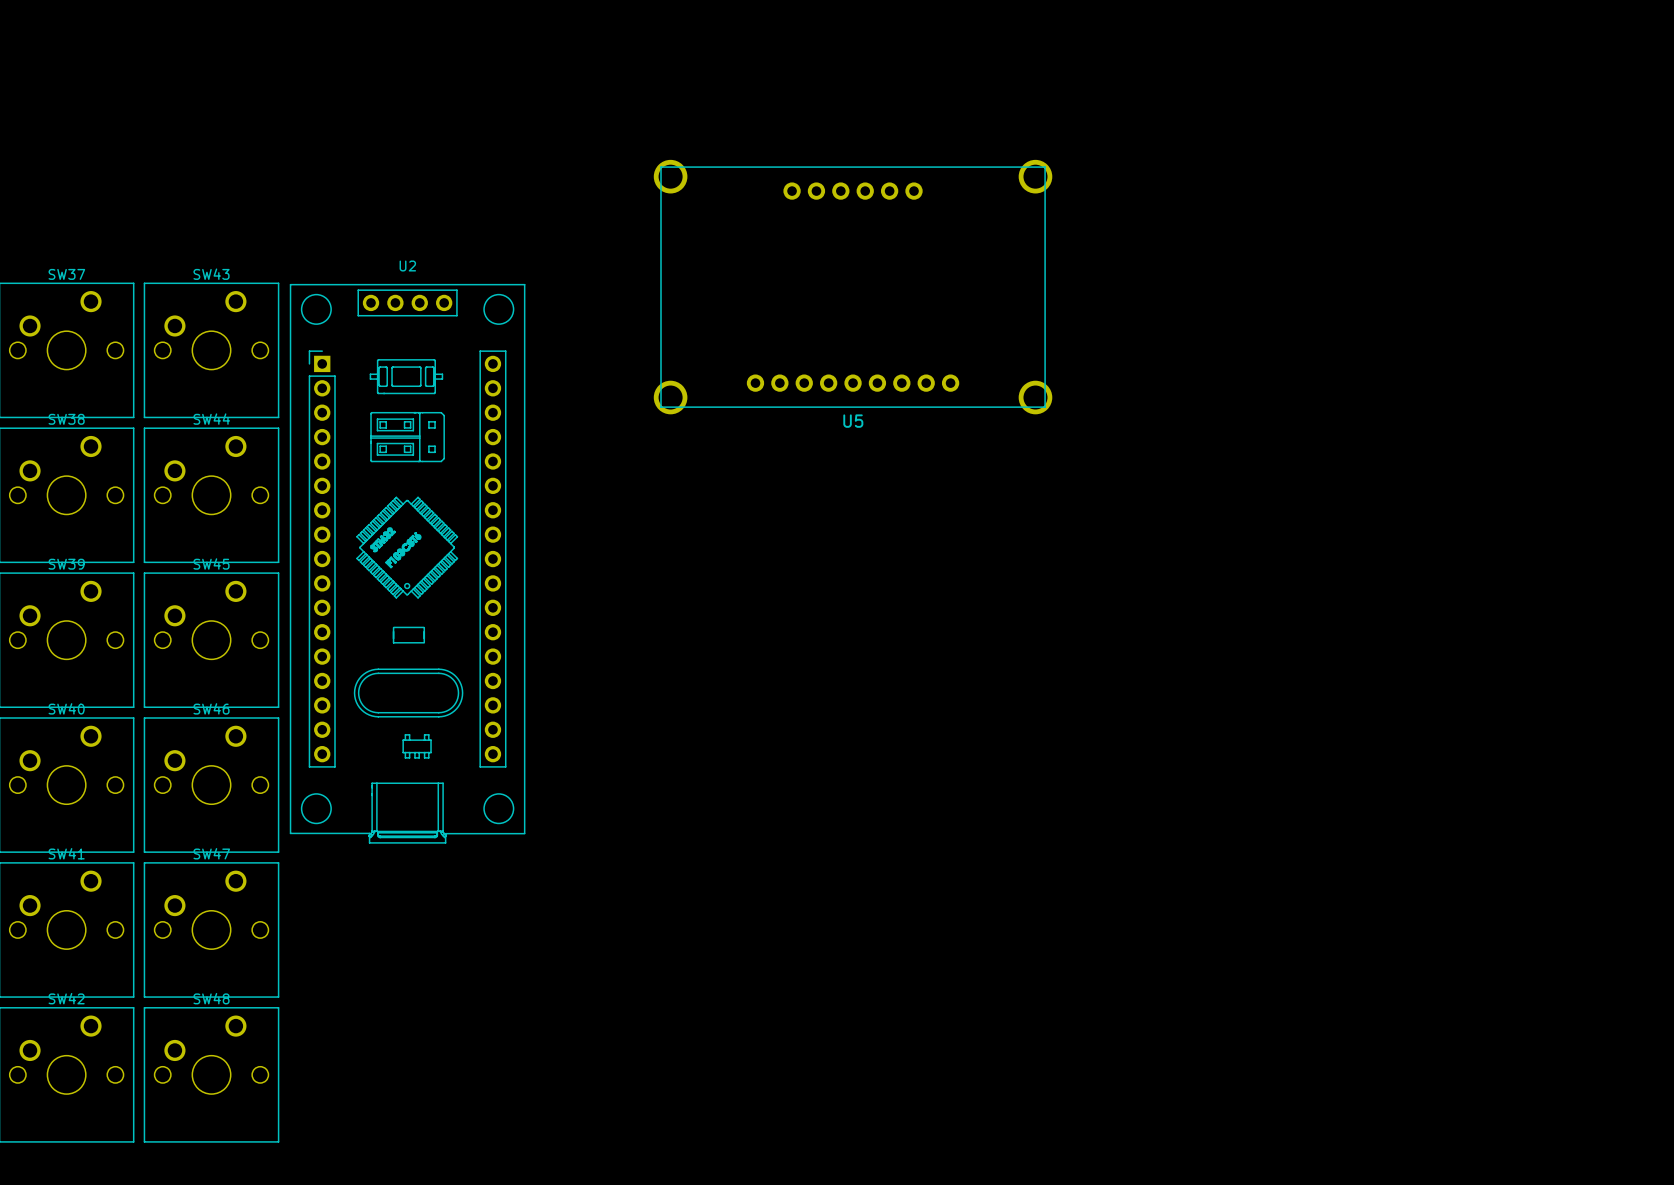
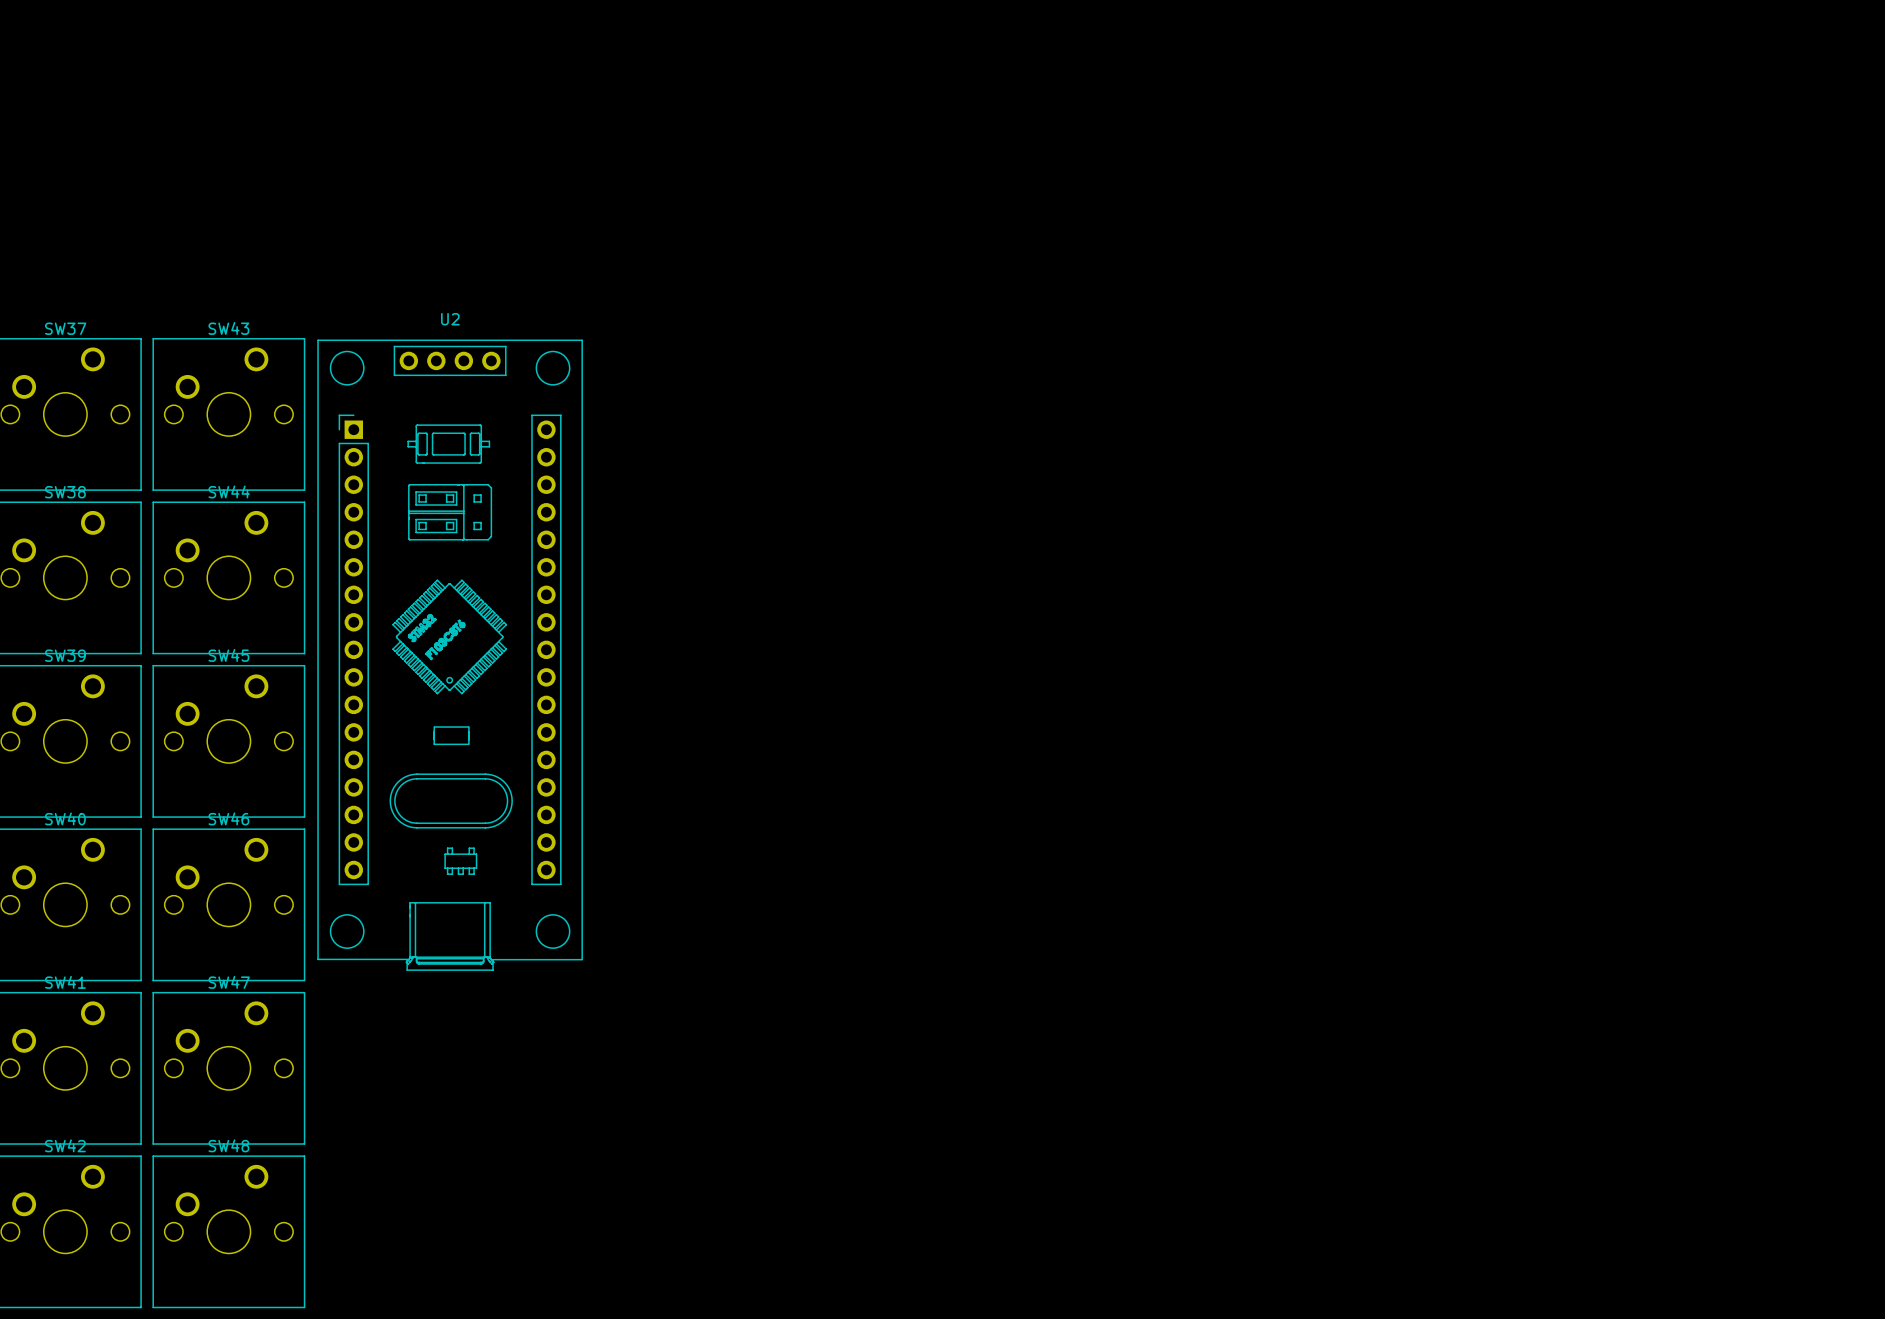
U5: (853, 287) -> none

